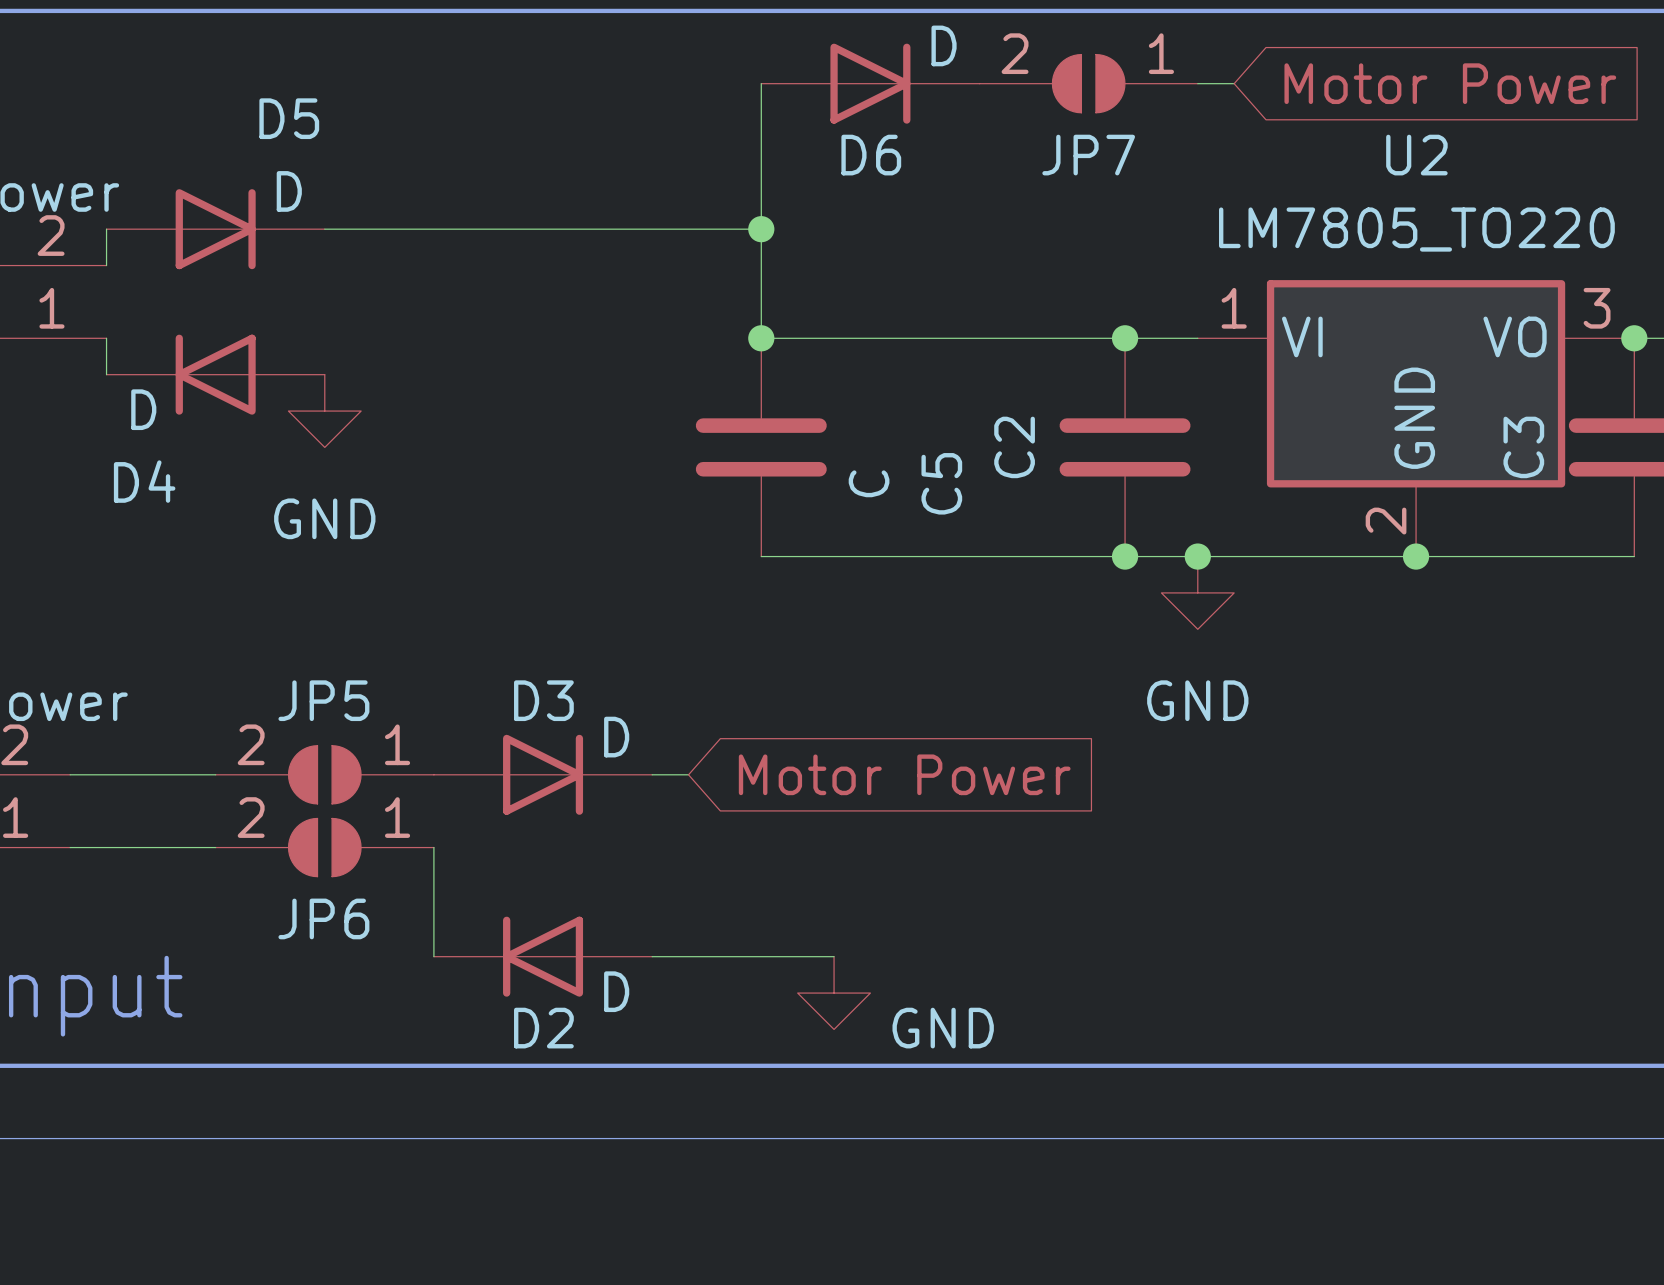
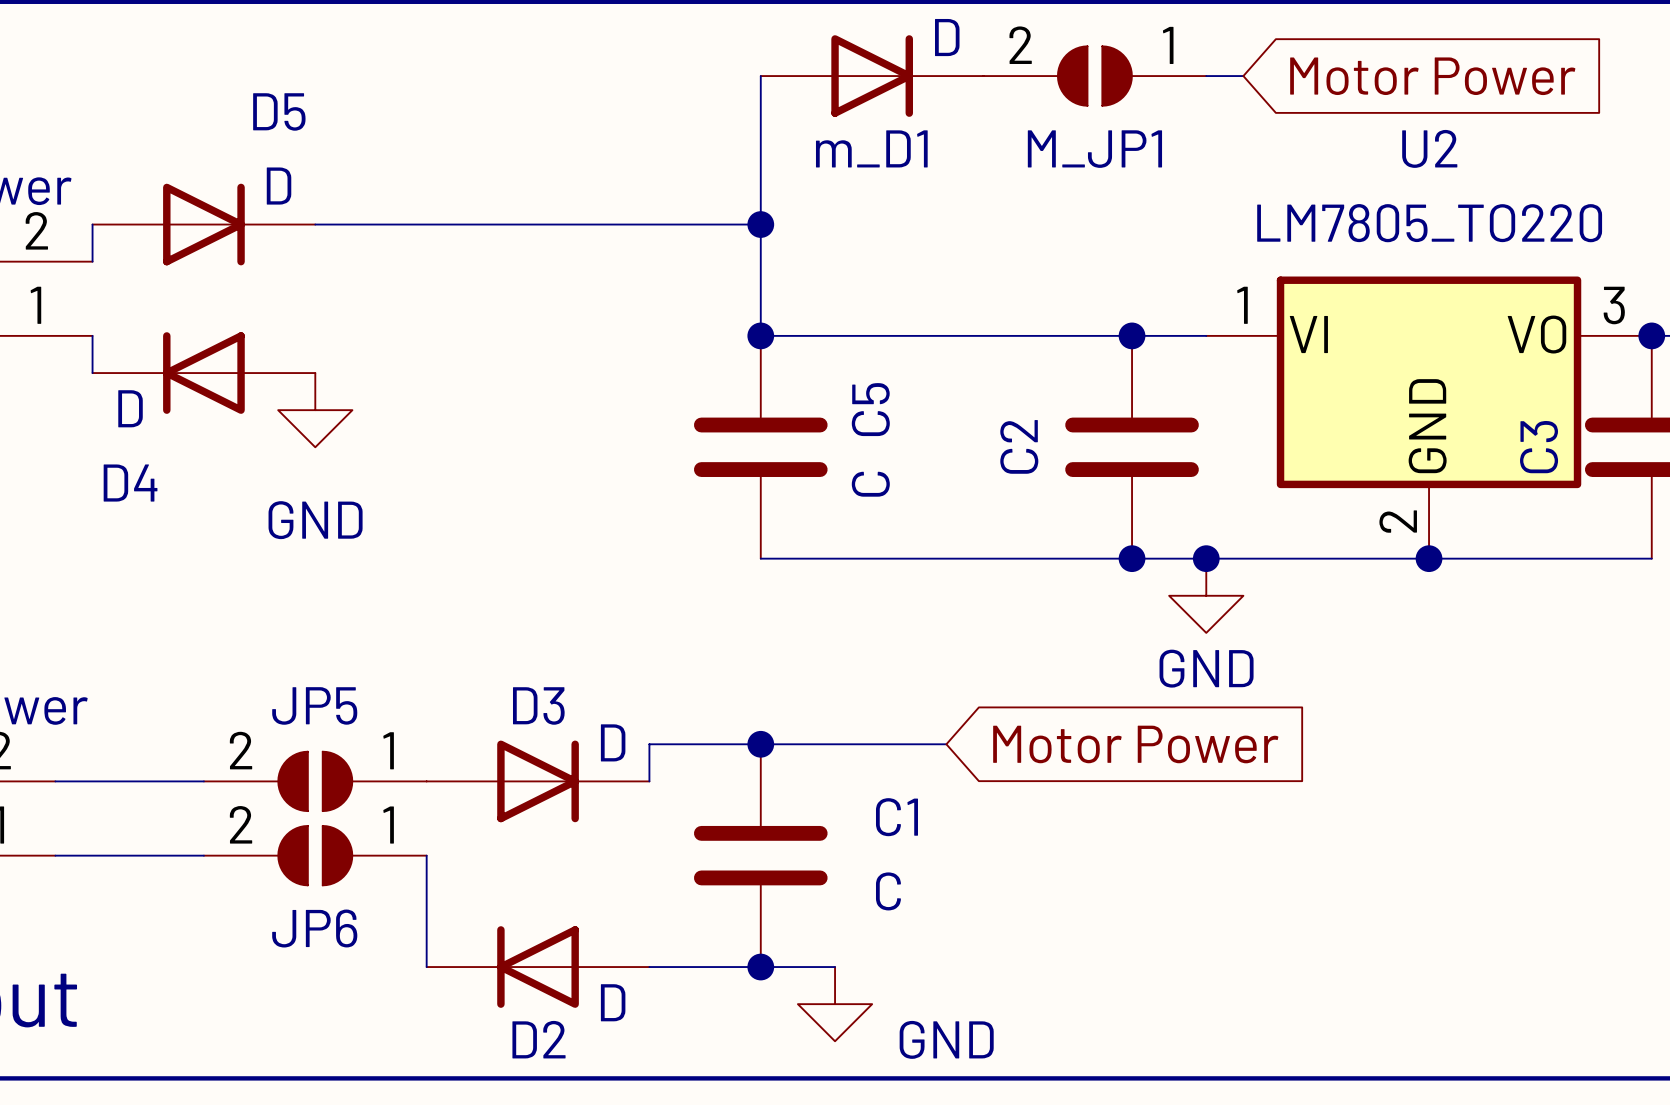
D6 name: D6 (871, 155) -> m_D1 (871, 148)
JP7 name: JP7 (1088, 155) -> M_JP1 (1094, 149)
C5 name position: C5 (941, 483) -> C5 (870, 409)
power symbol text position: GND (1197, 700) -> GND (1206, 668)
junction: none -> (760, 744)
wire: (652, 774) (688, 774) -> (649, 781) (649, 744) (946, 744)
global label position: Motor Power (904, 774) -> Motor Power (1135, 744)
C1: none -> C (760, 855)
junction: none -> (760, 967)

